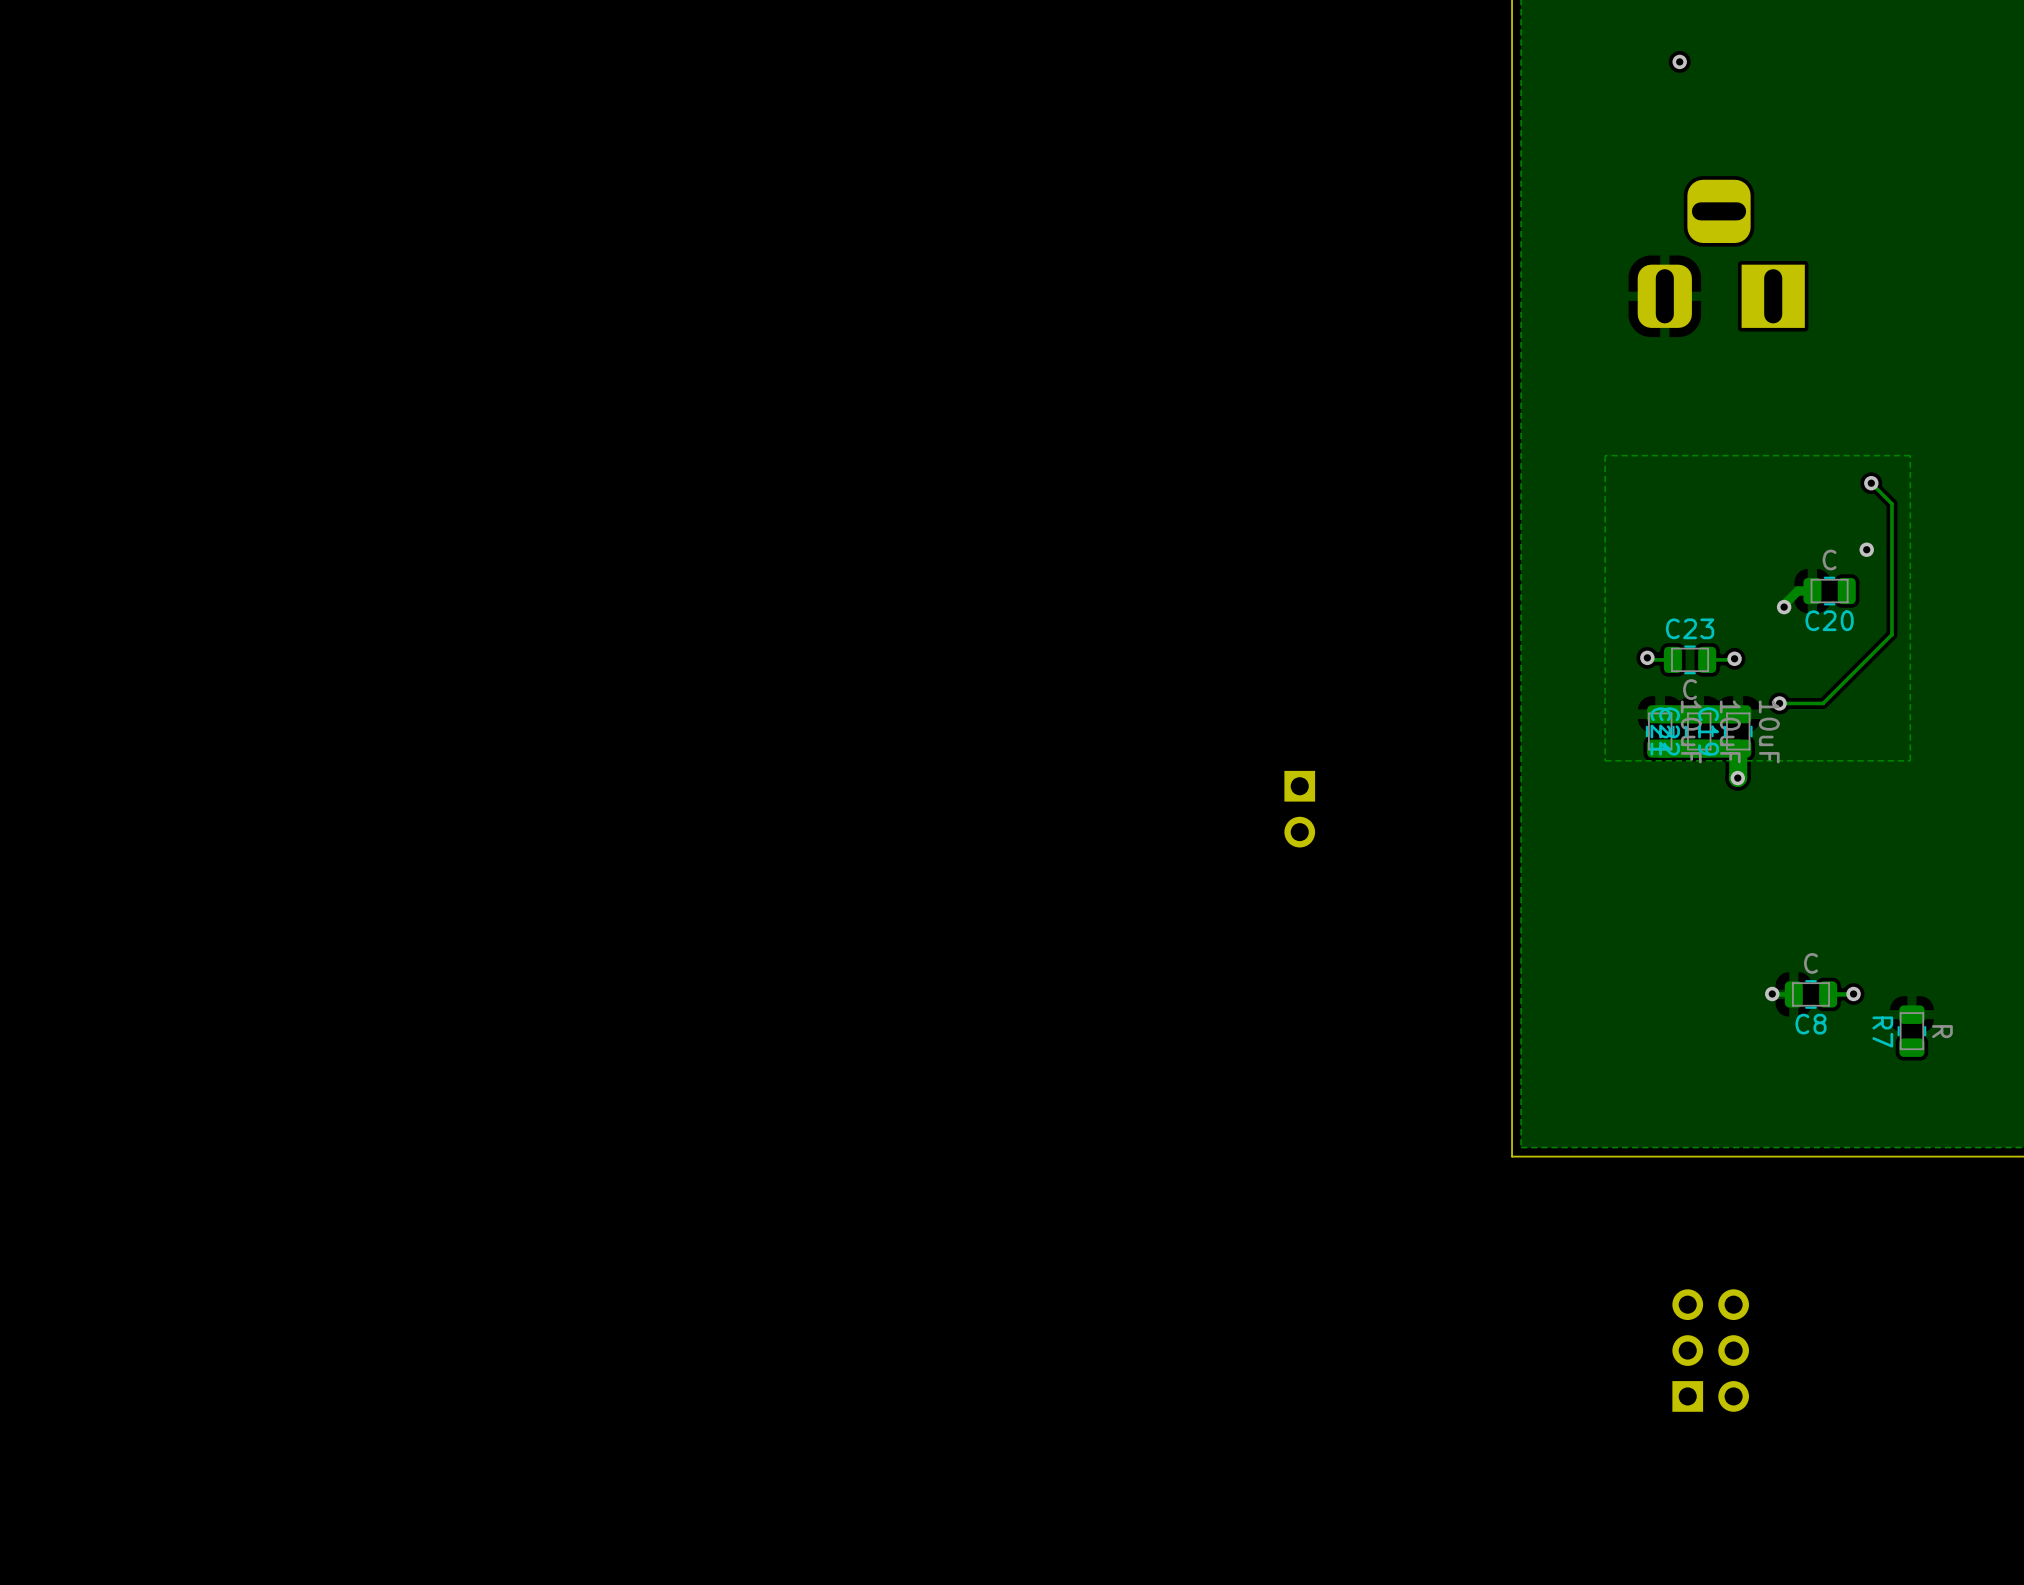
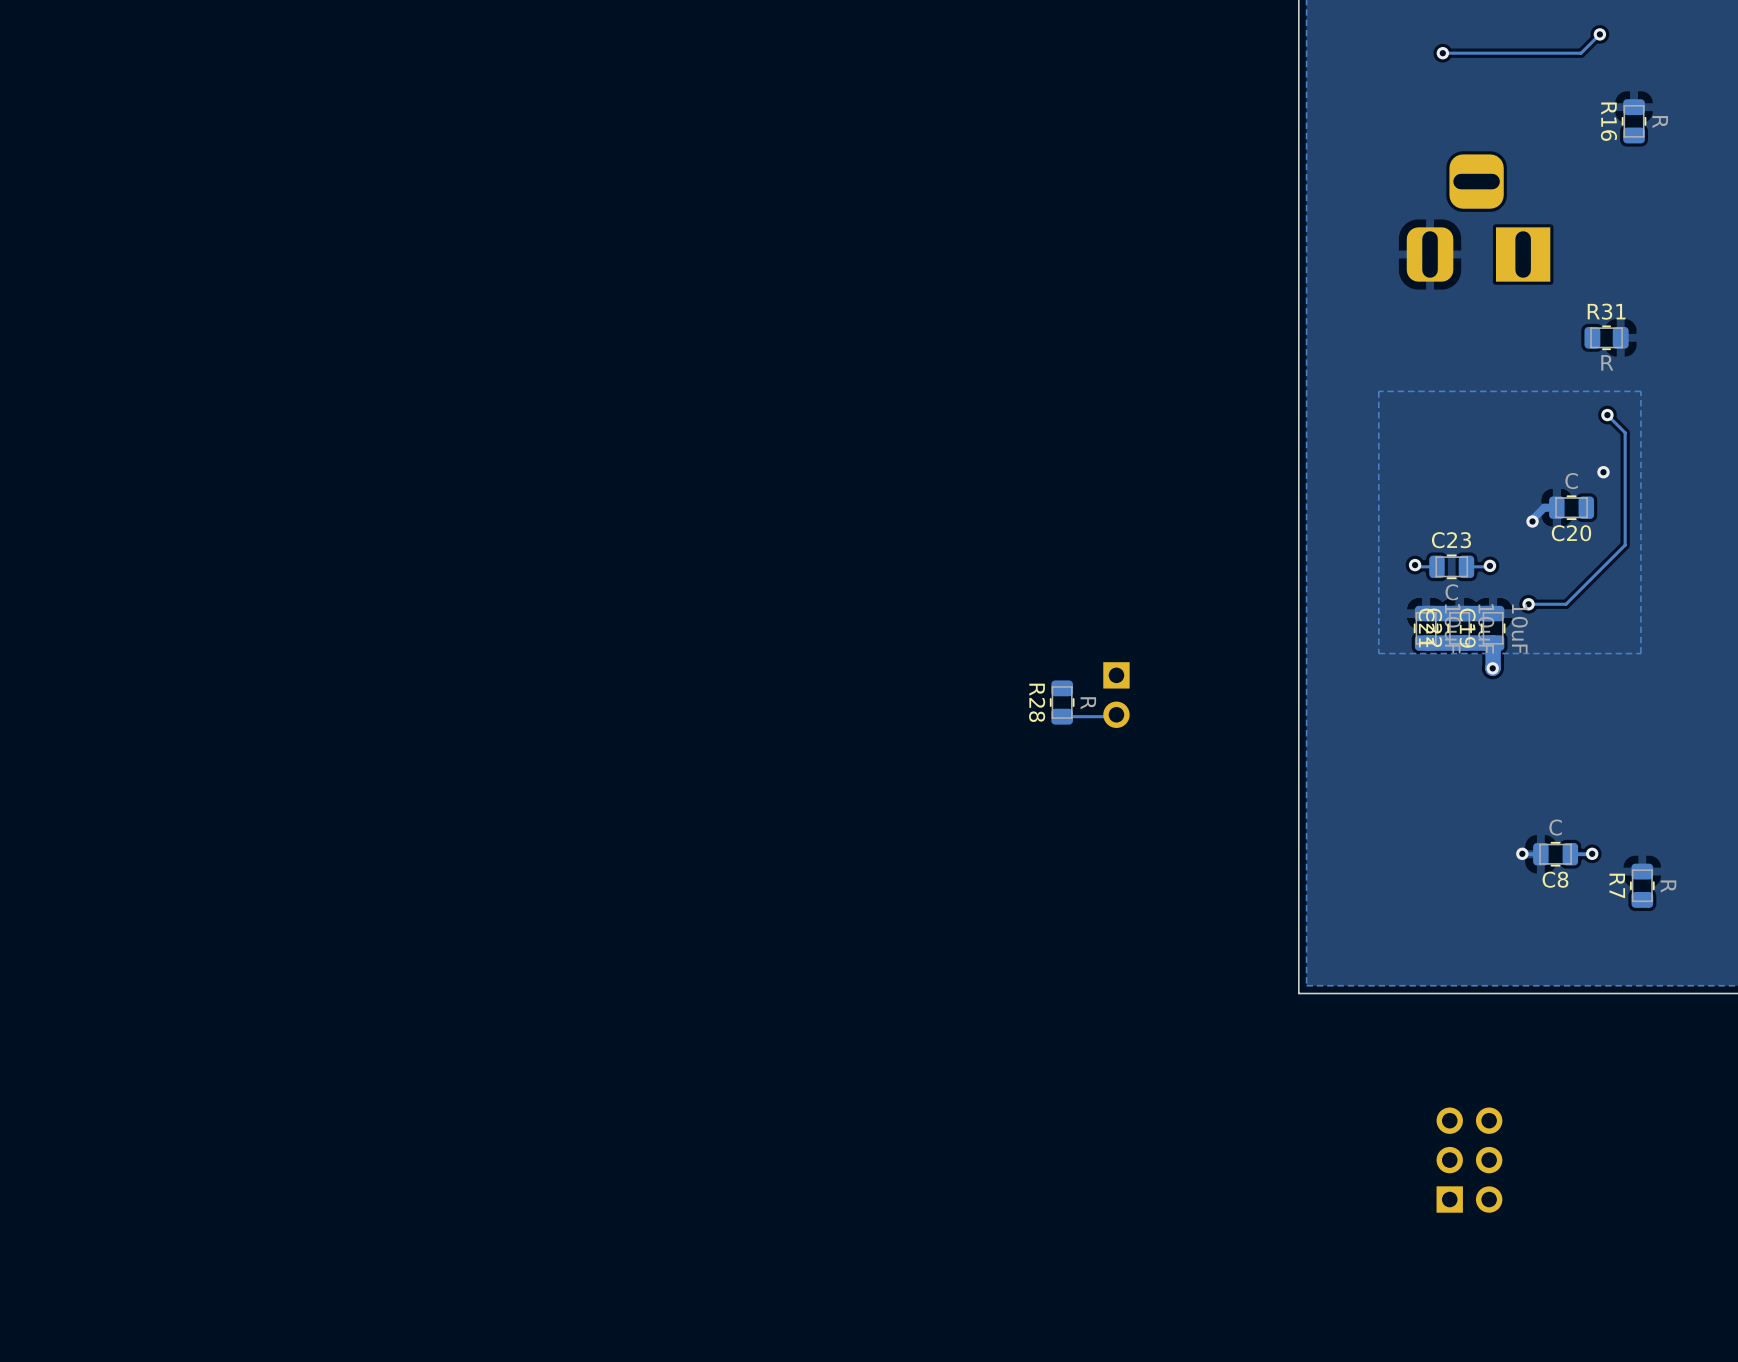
track: none -> (1599, 34) (1581, 53) (1442, 53)
via: none -> (1599, 34)
R16: none -> R (1634, 121)
R31: none -> R (1606, 337)
R28: none -> R (1062, 702)
track: none -> (1116, 714) (1114, 716) (1062, 716)

